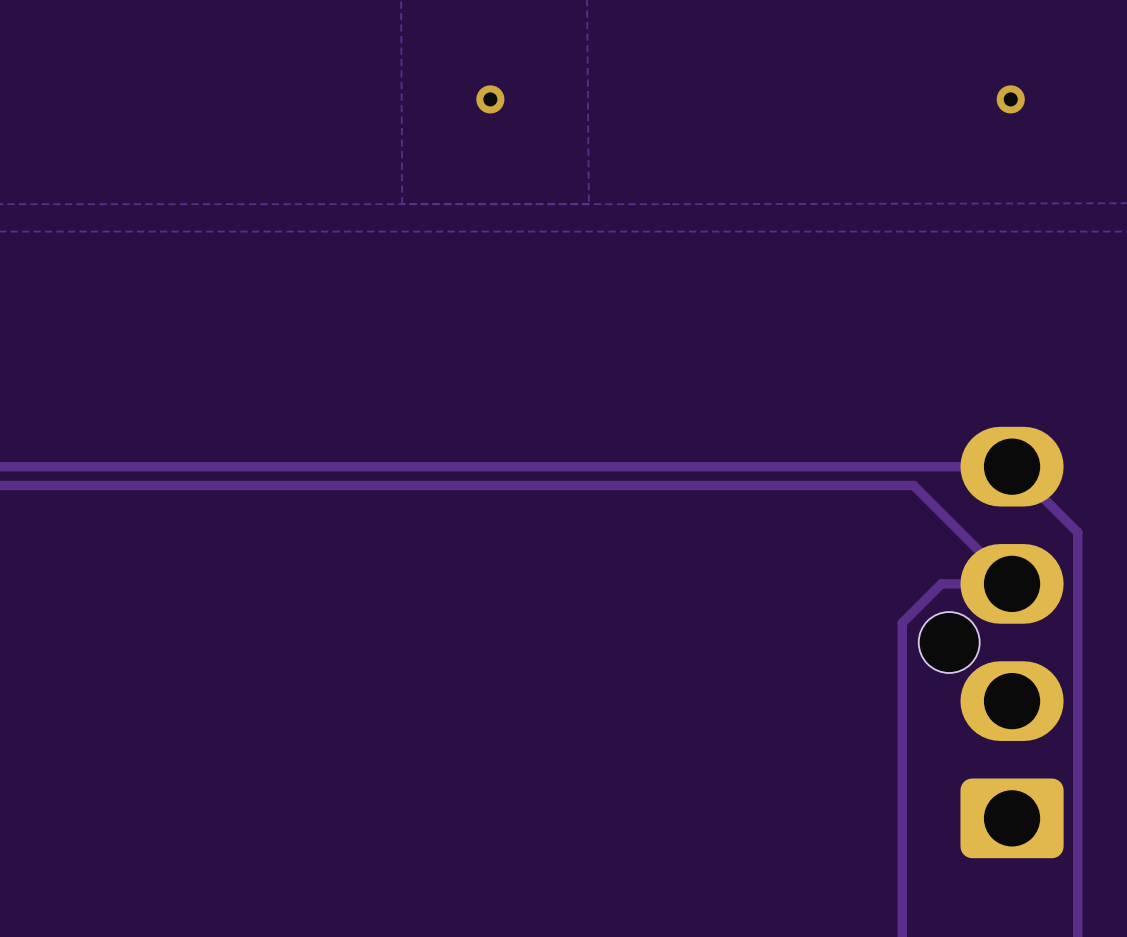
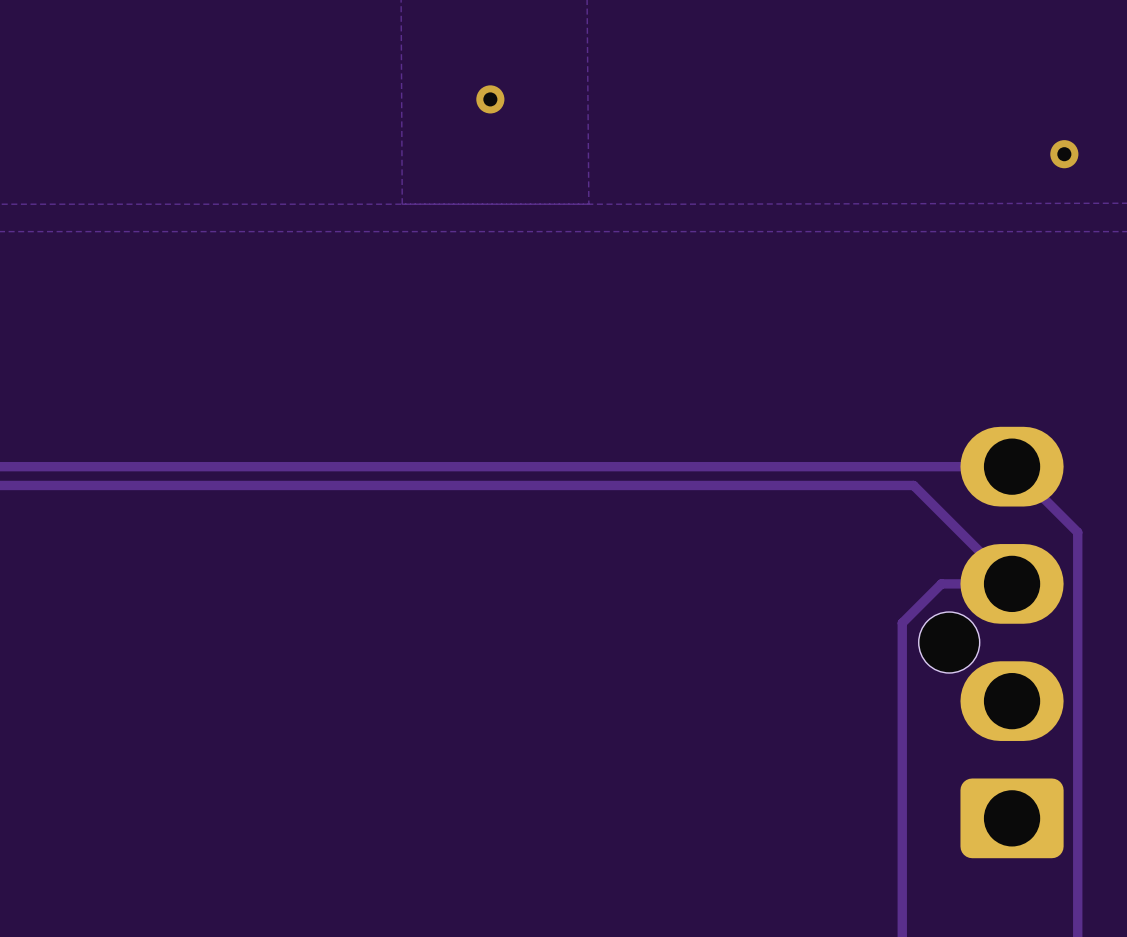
via position: (1010, 99) -> (1064, 154)

